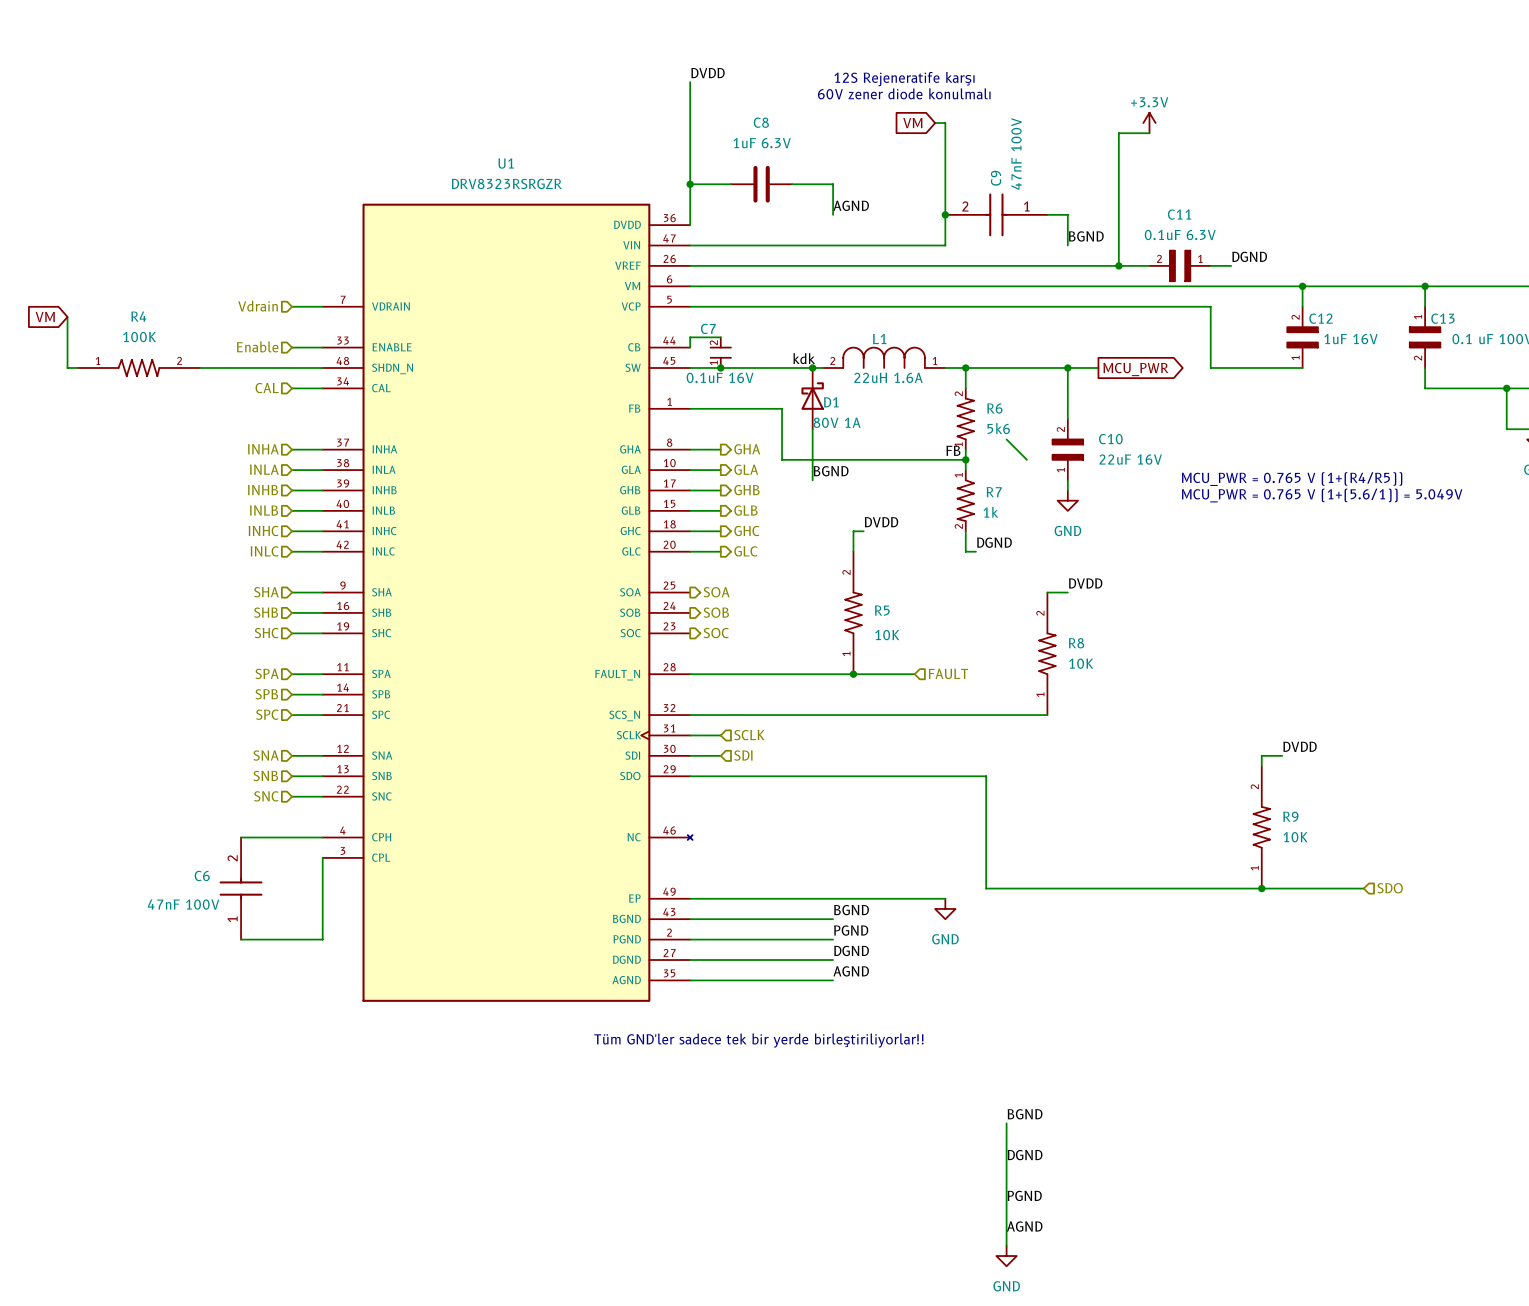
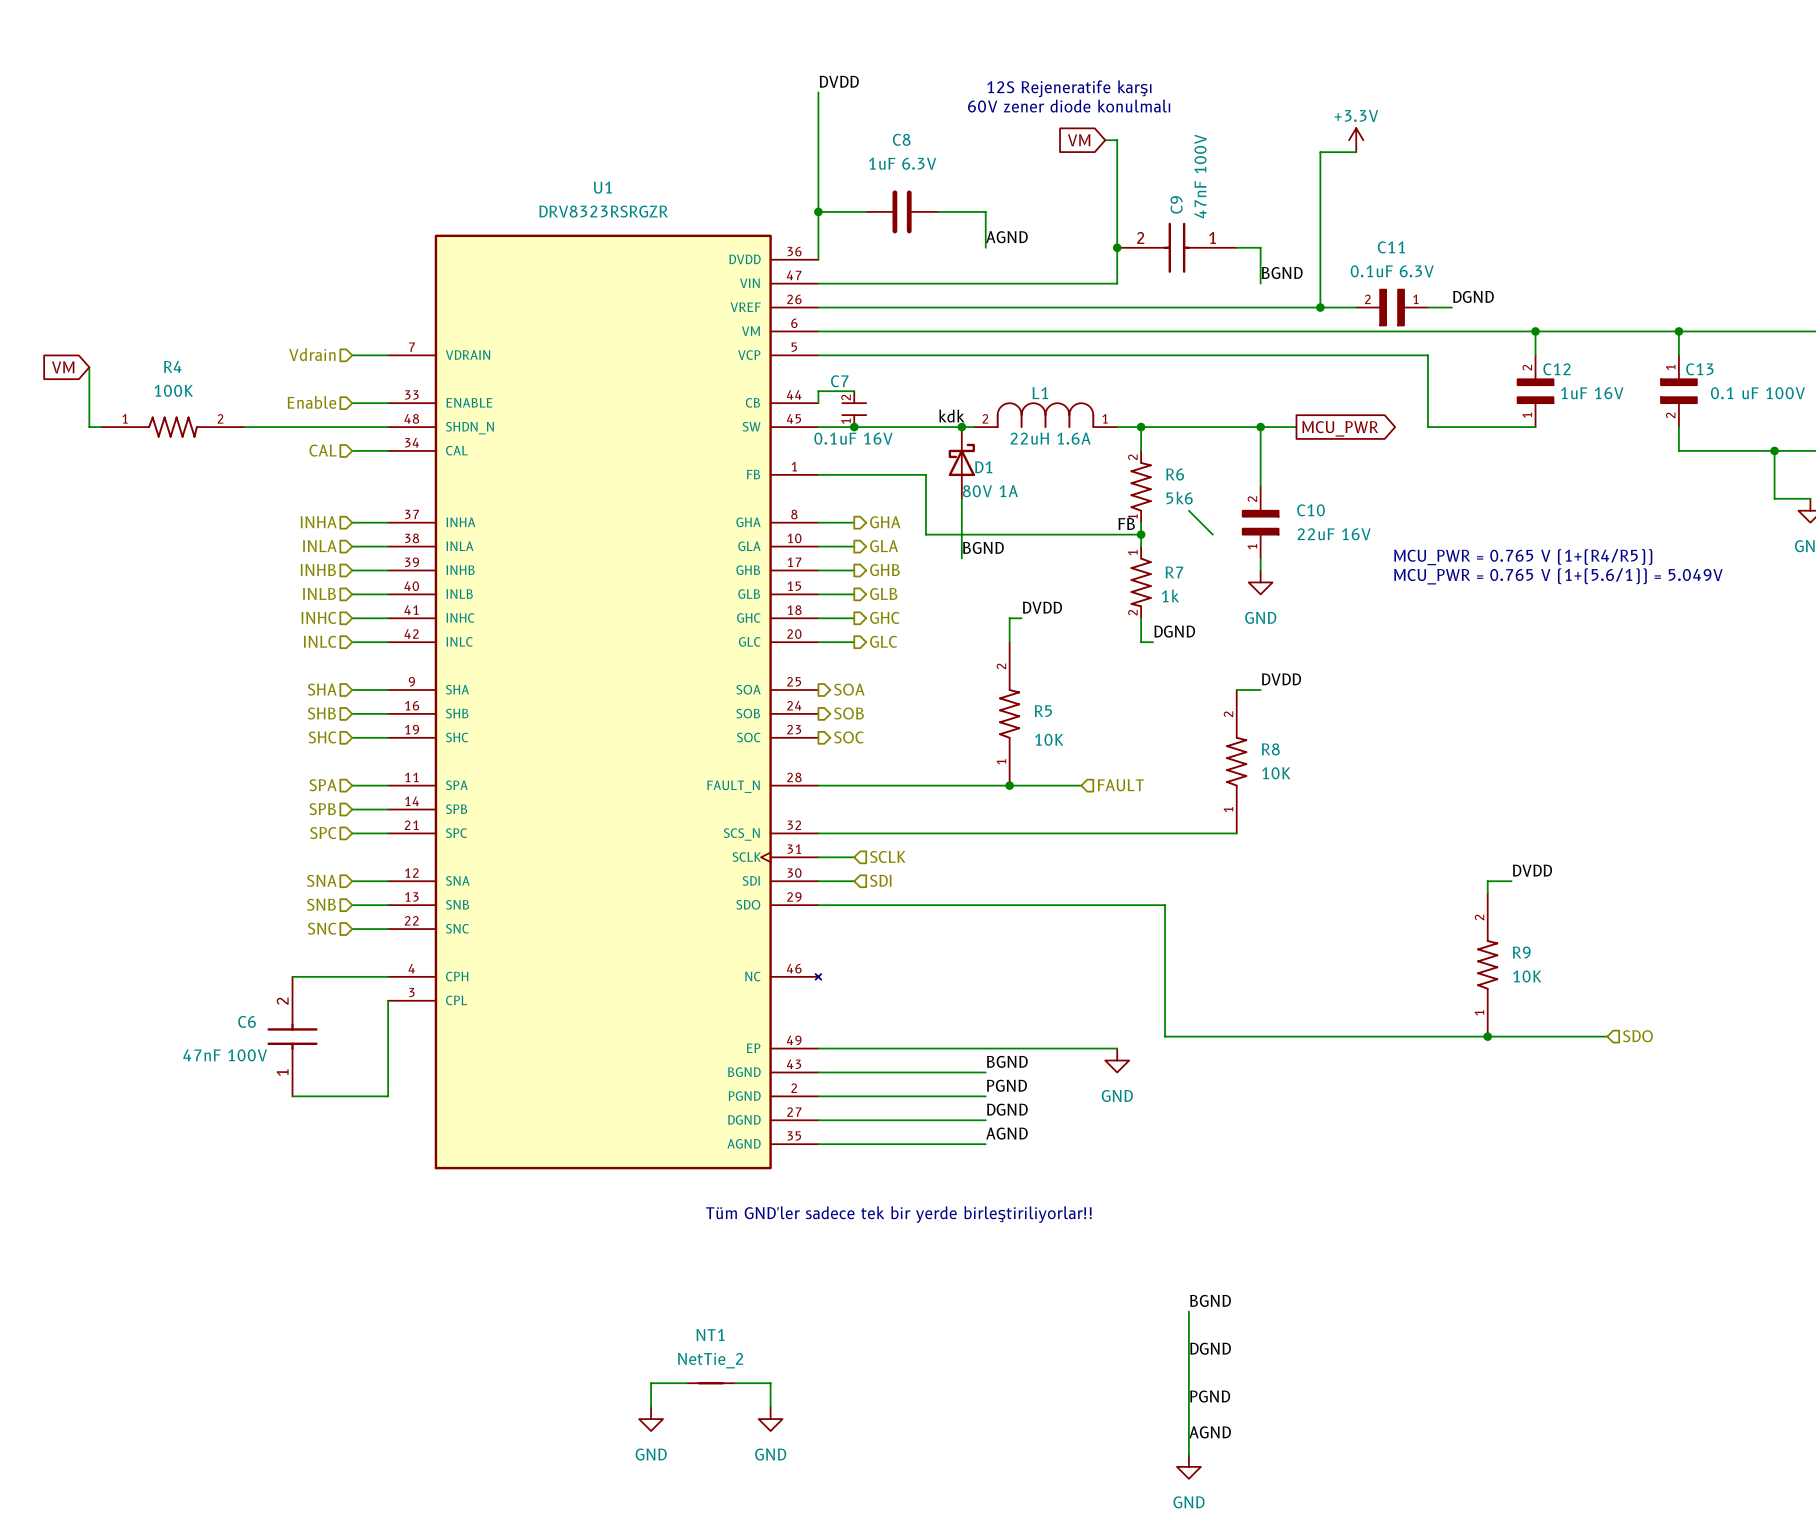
wire: none -> (686, 1383) (651, 1383) (651, 1407)
NT1: none -> NetTie_2 (710, 1383)
wire: none -> (734, 1383) (770, 1383) (770, 1407)
power symbol: none -> GND (651, 1419)
power symbol: none -> GND (770, 1419)

